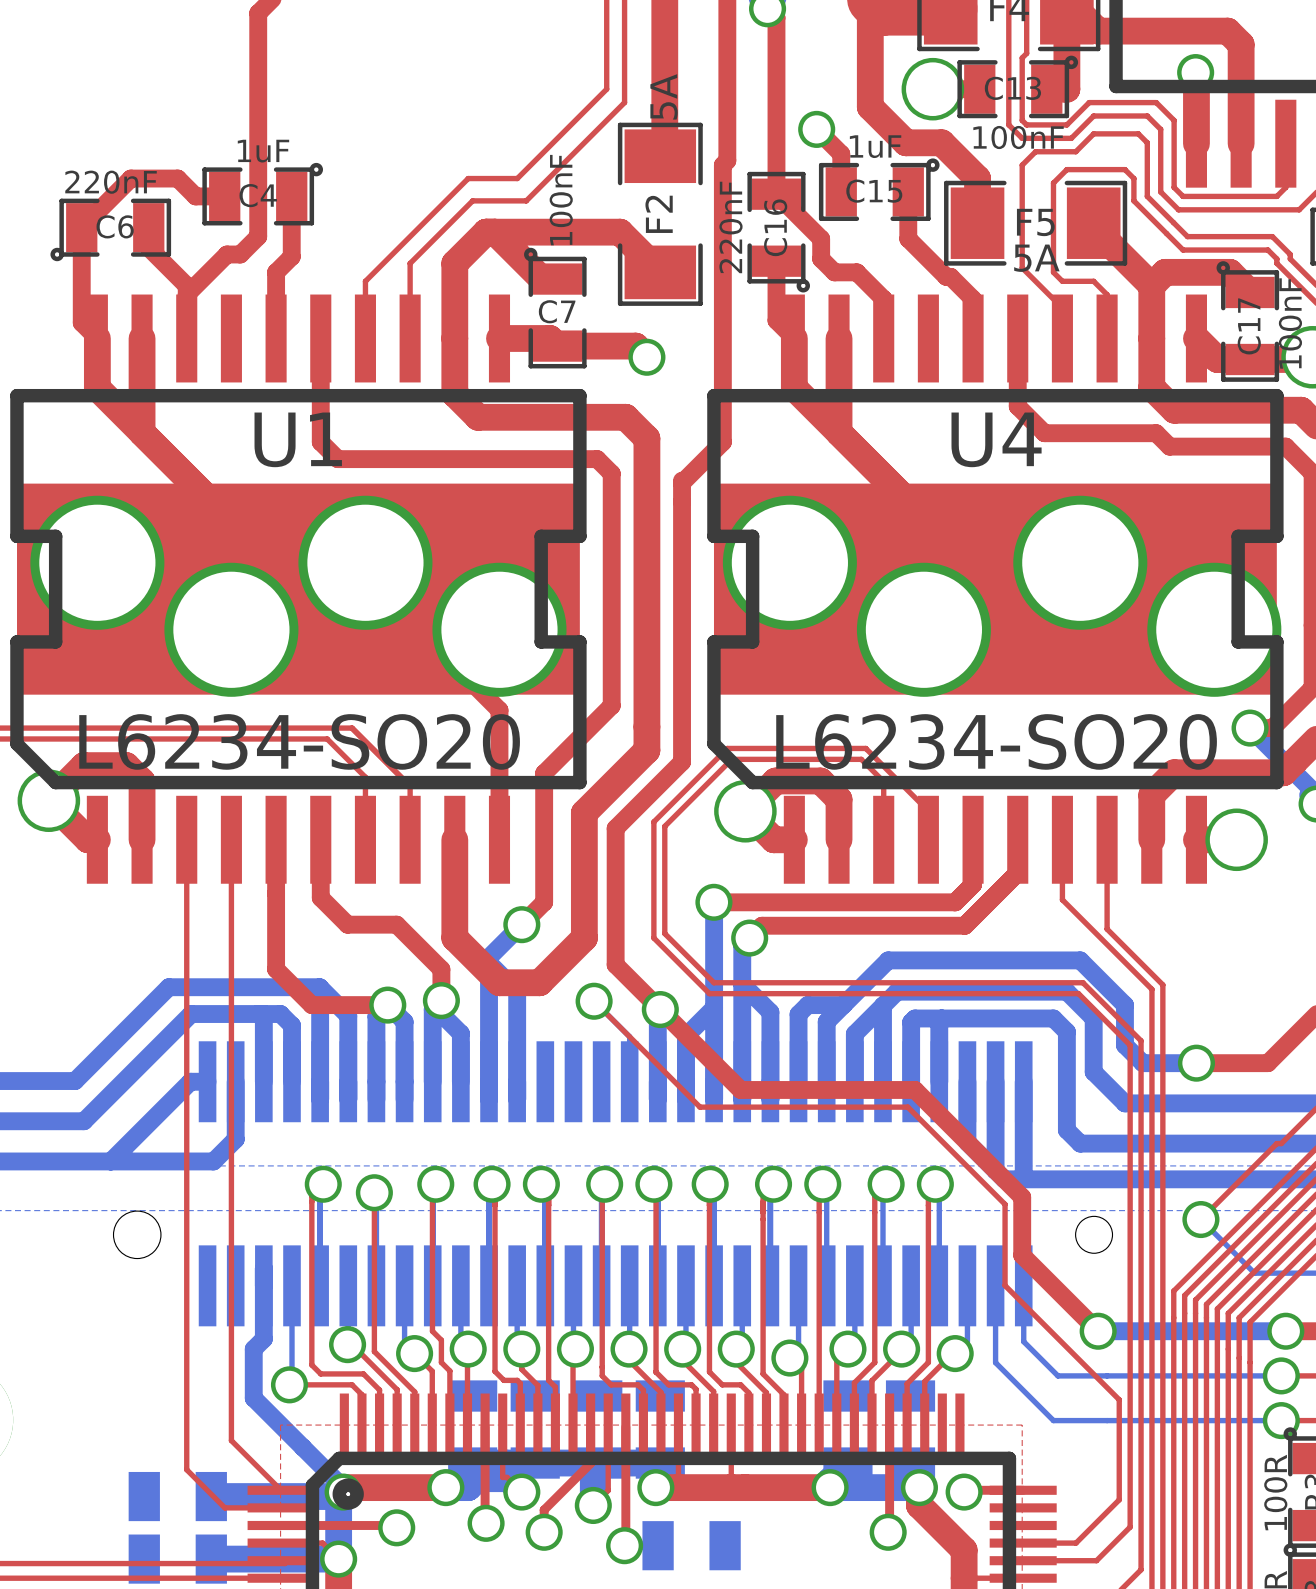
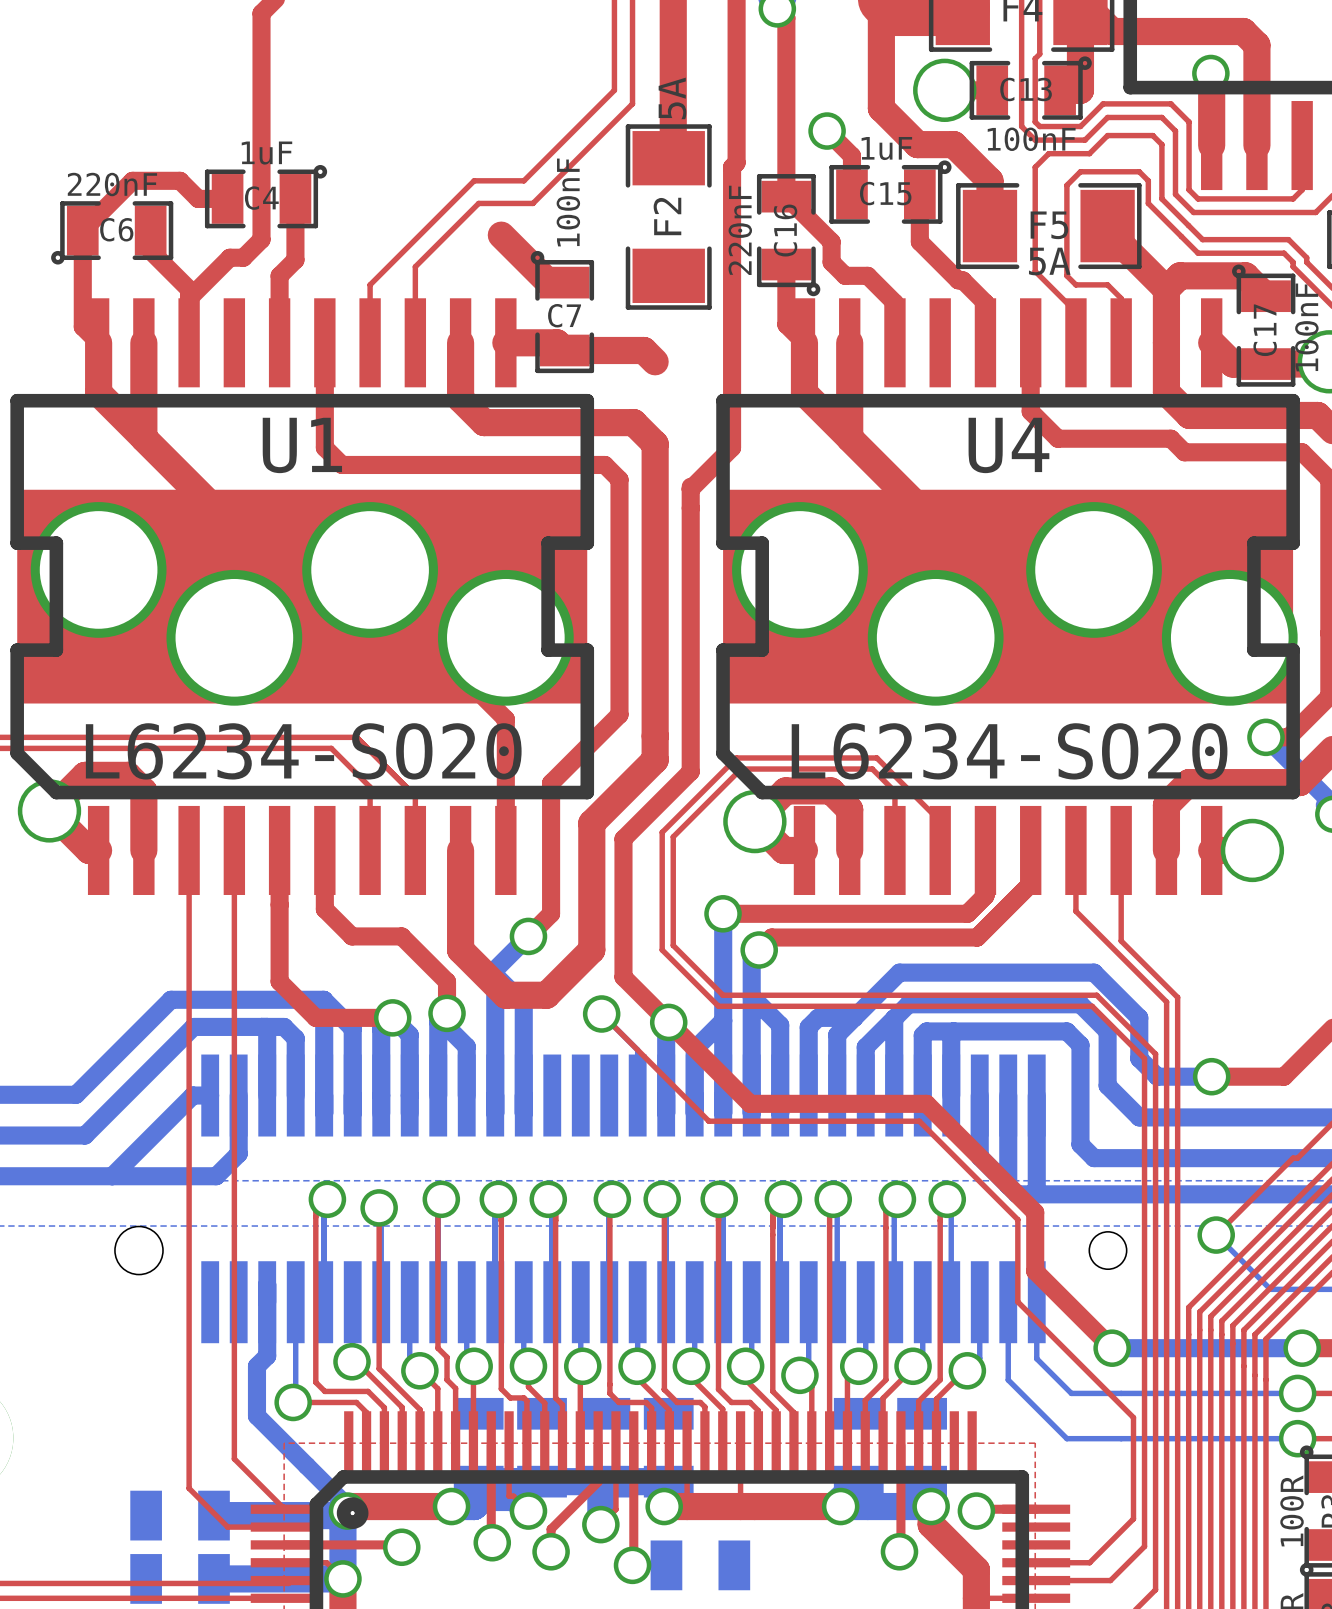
top track: (660, 272) (620, 232) (486, 232) (454, 263) (454, 338) -> none
via: (646, 357) -> none

